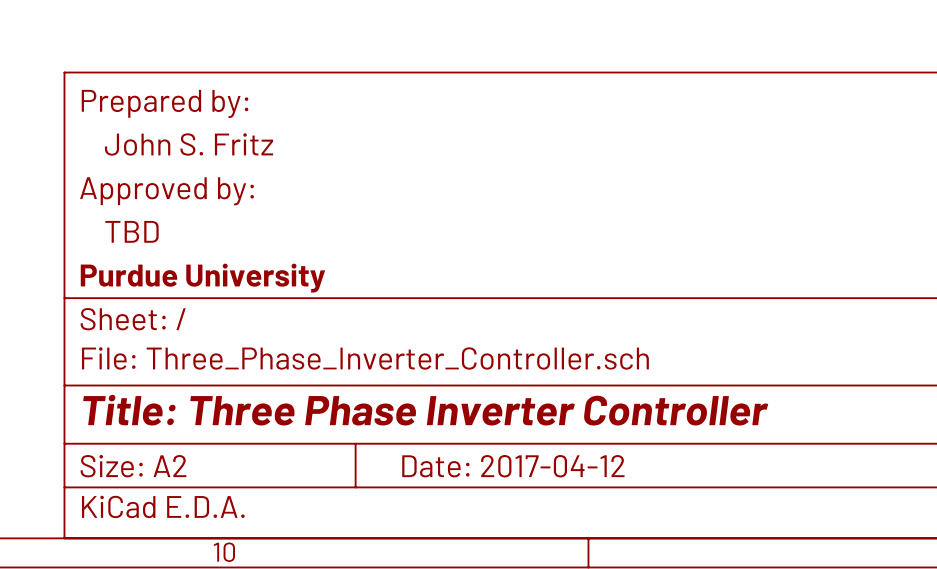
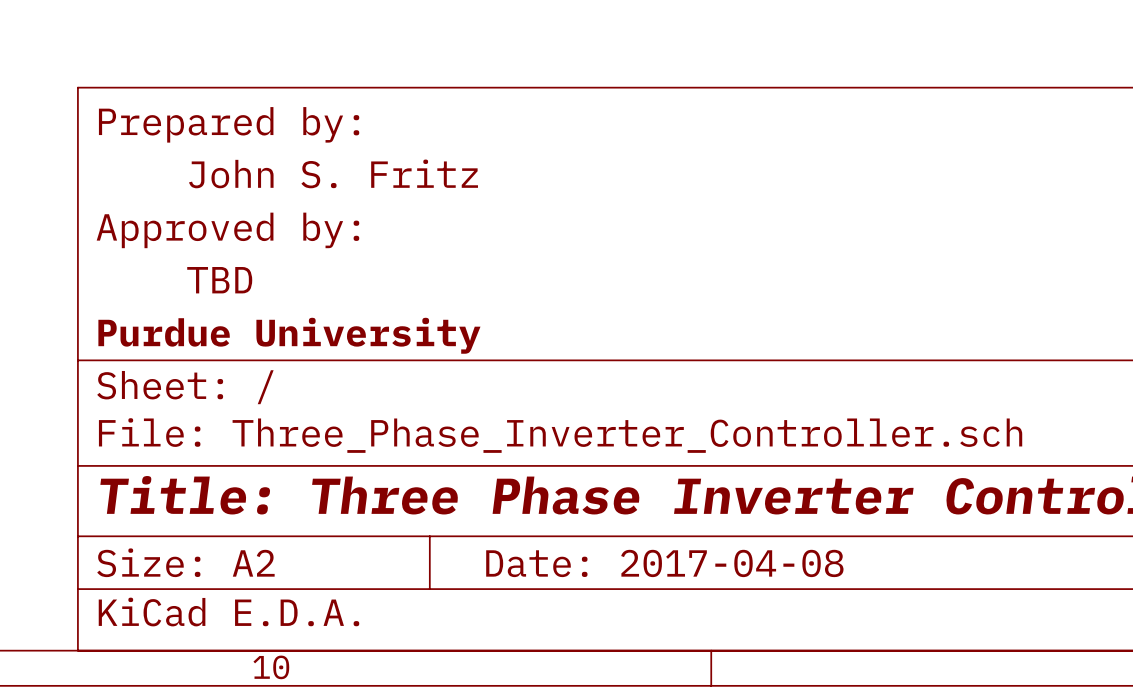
title block: Date: 2017-04-12 (513, 466) -> Date: 2017-04-08 (664, 563)

